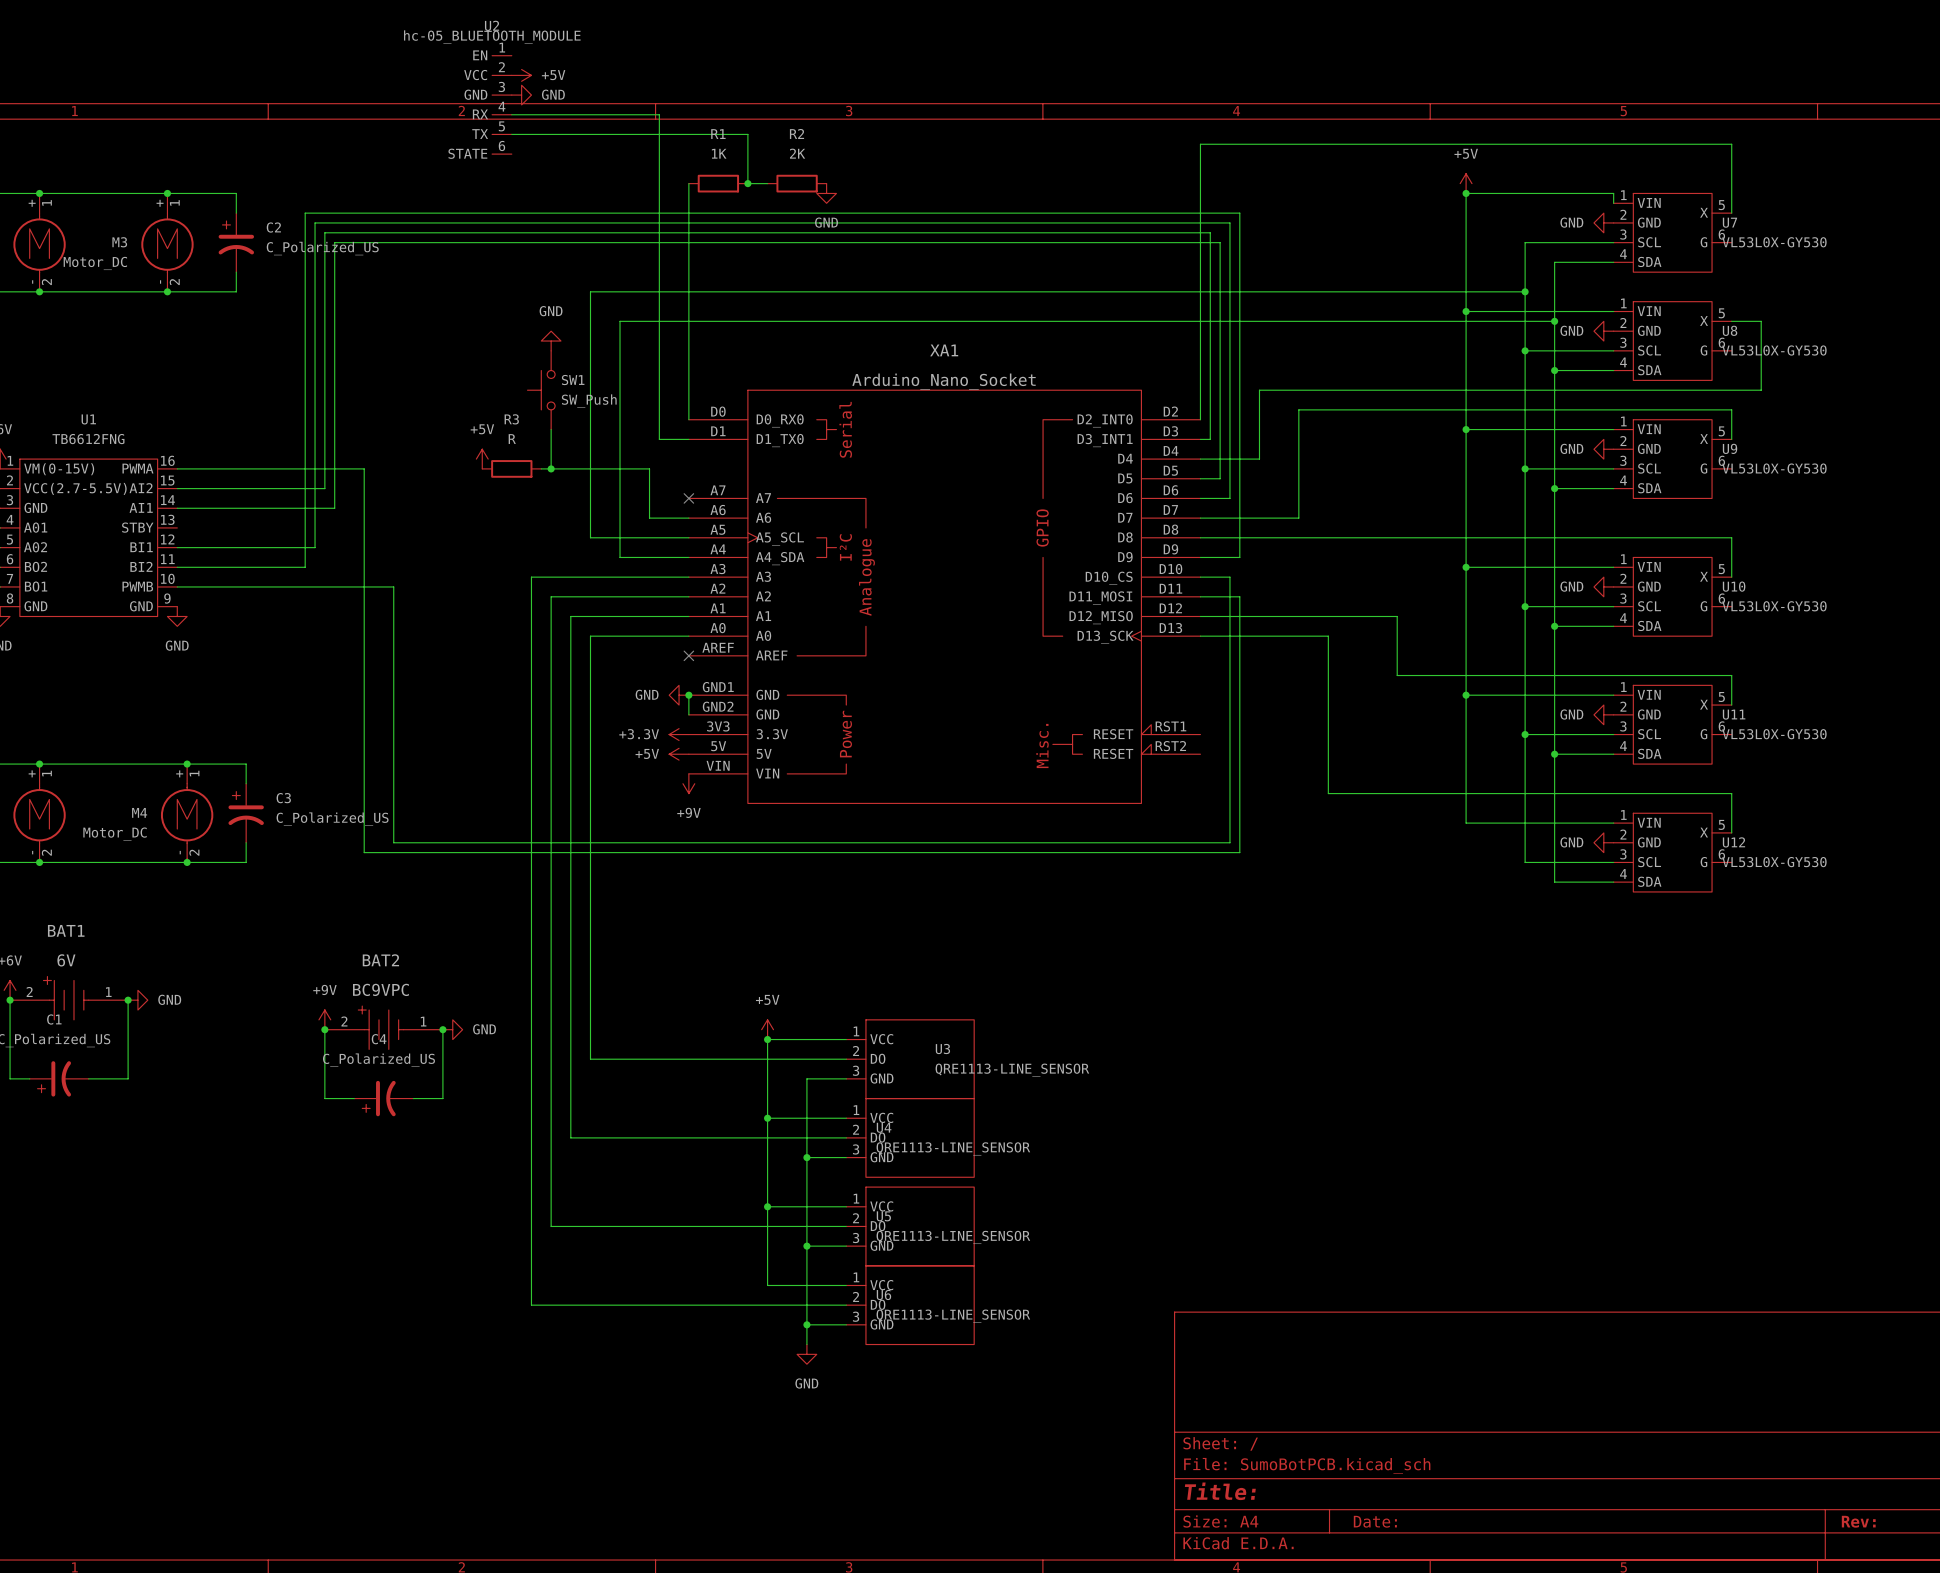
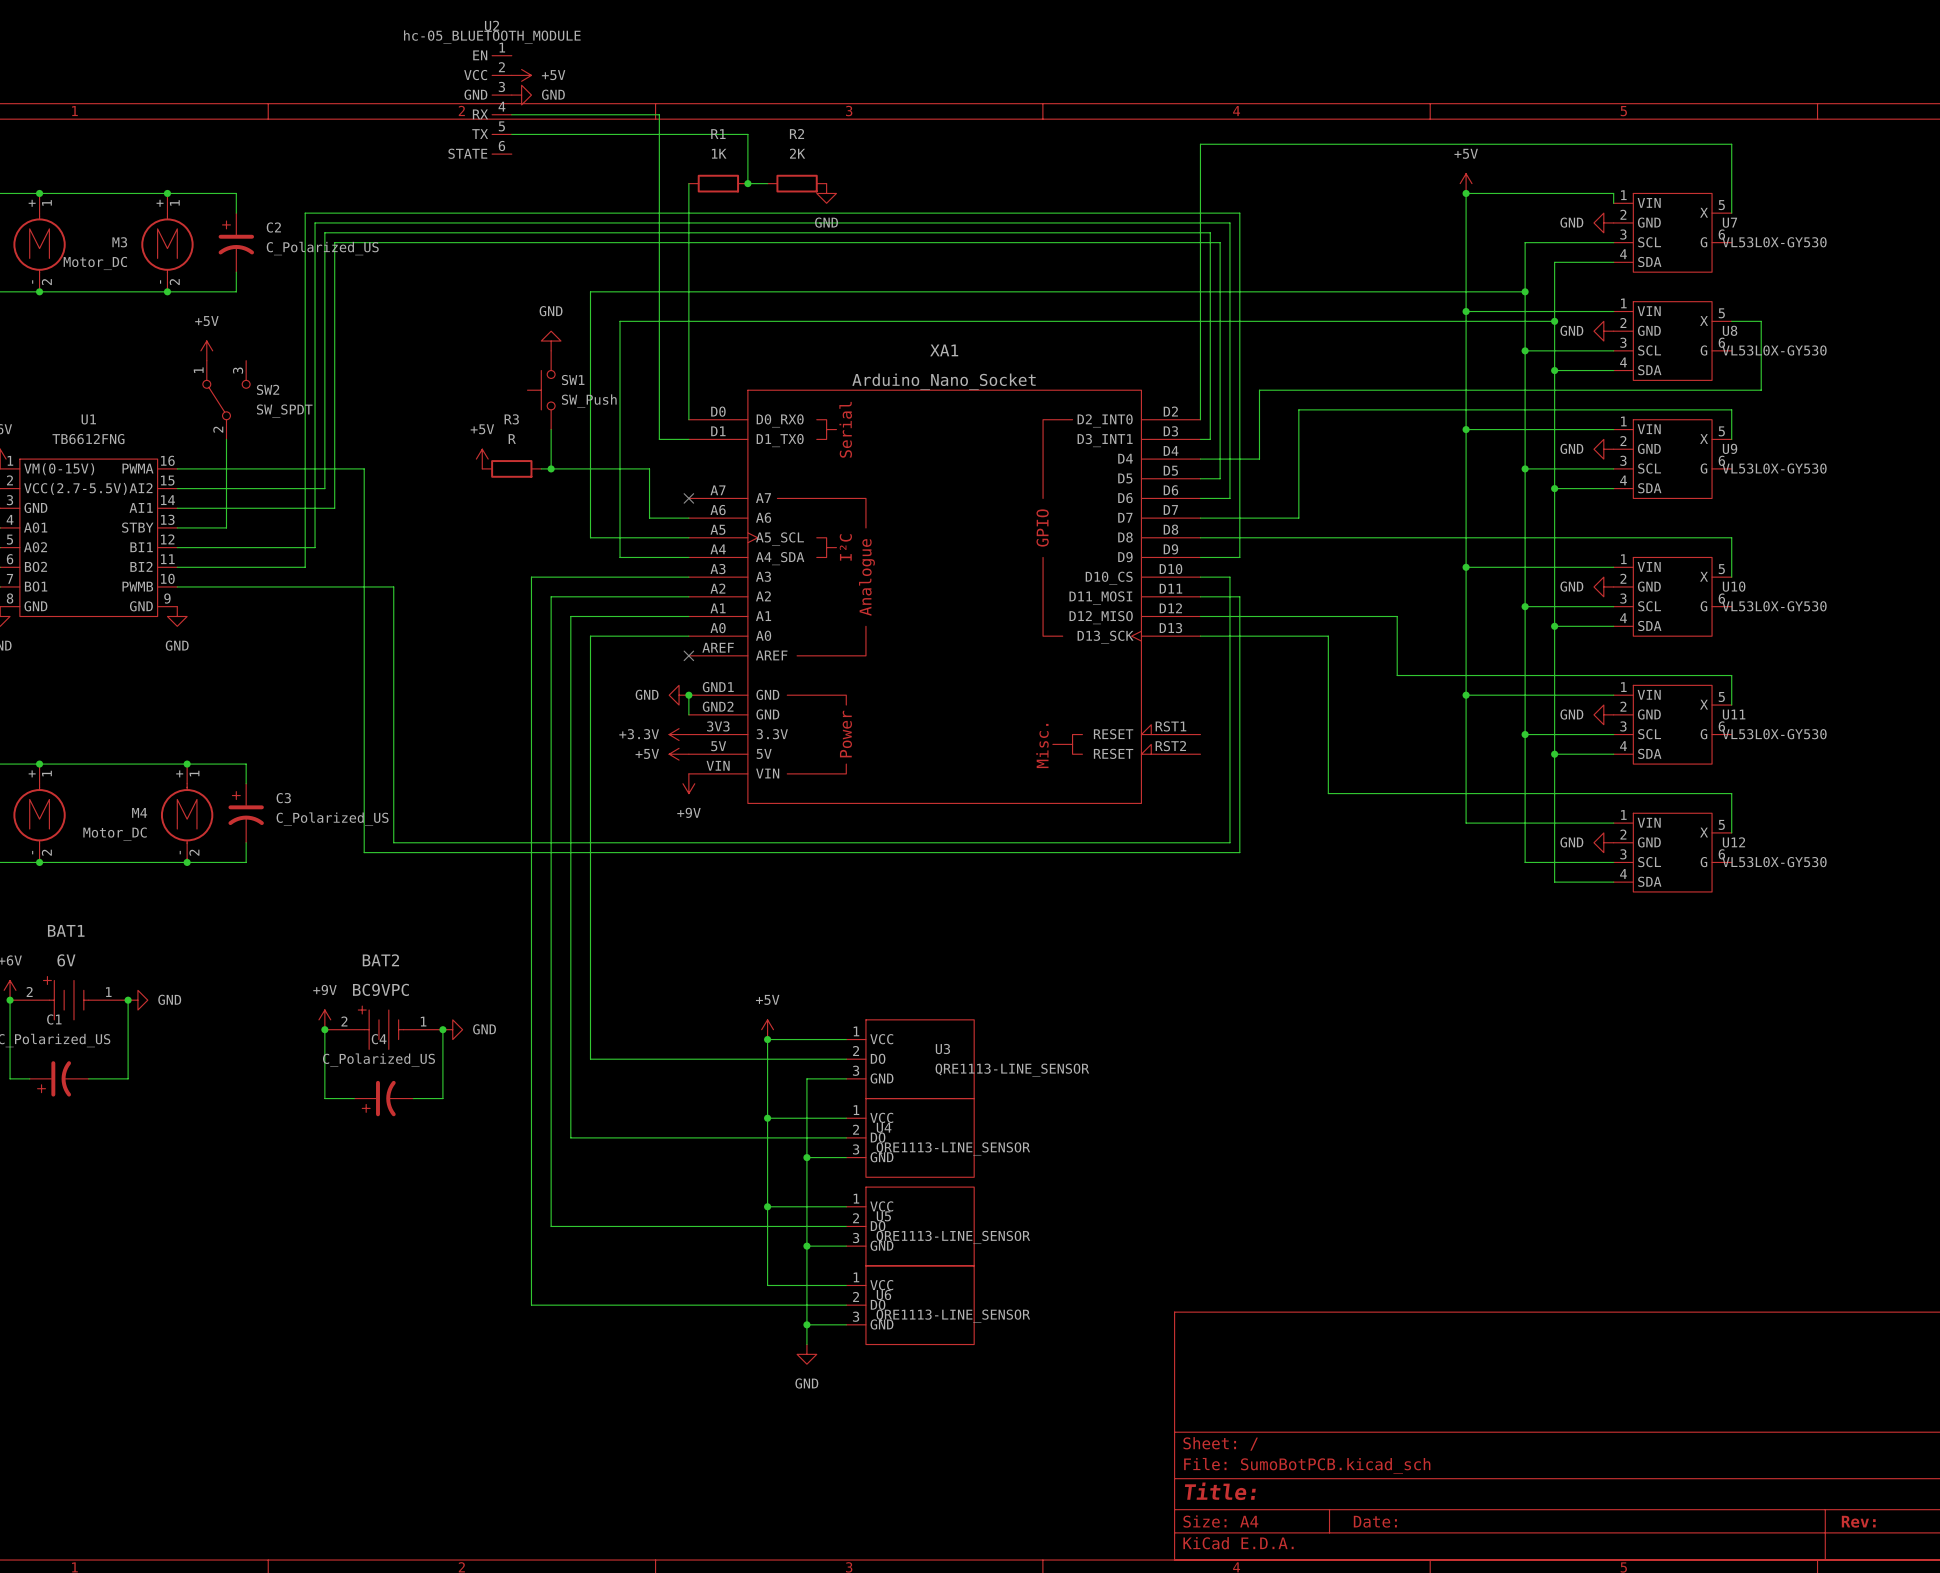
power symbol: none -> +5V (206, 350)
SW2: none -> SW_SPDT (226, 400)
wire: none -> (226, 439) (226, 527) (177, 527)

